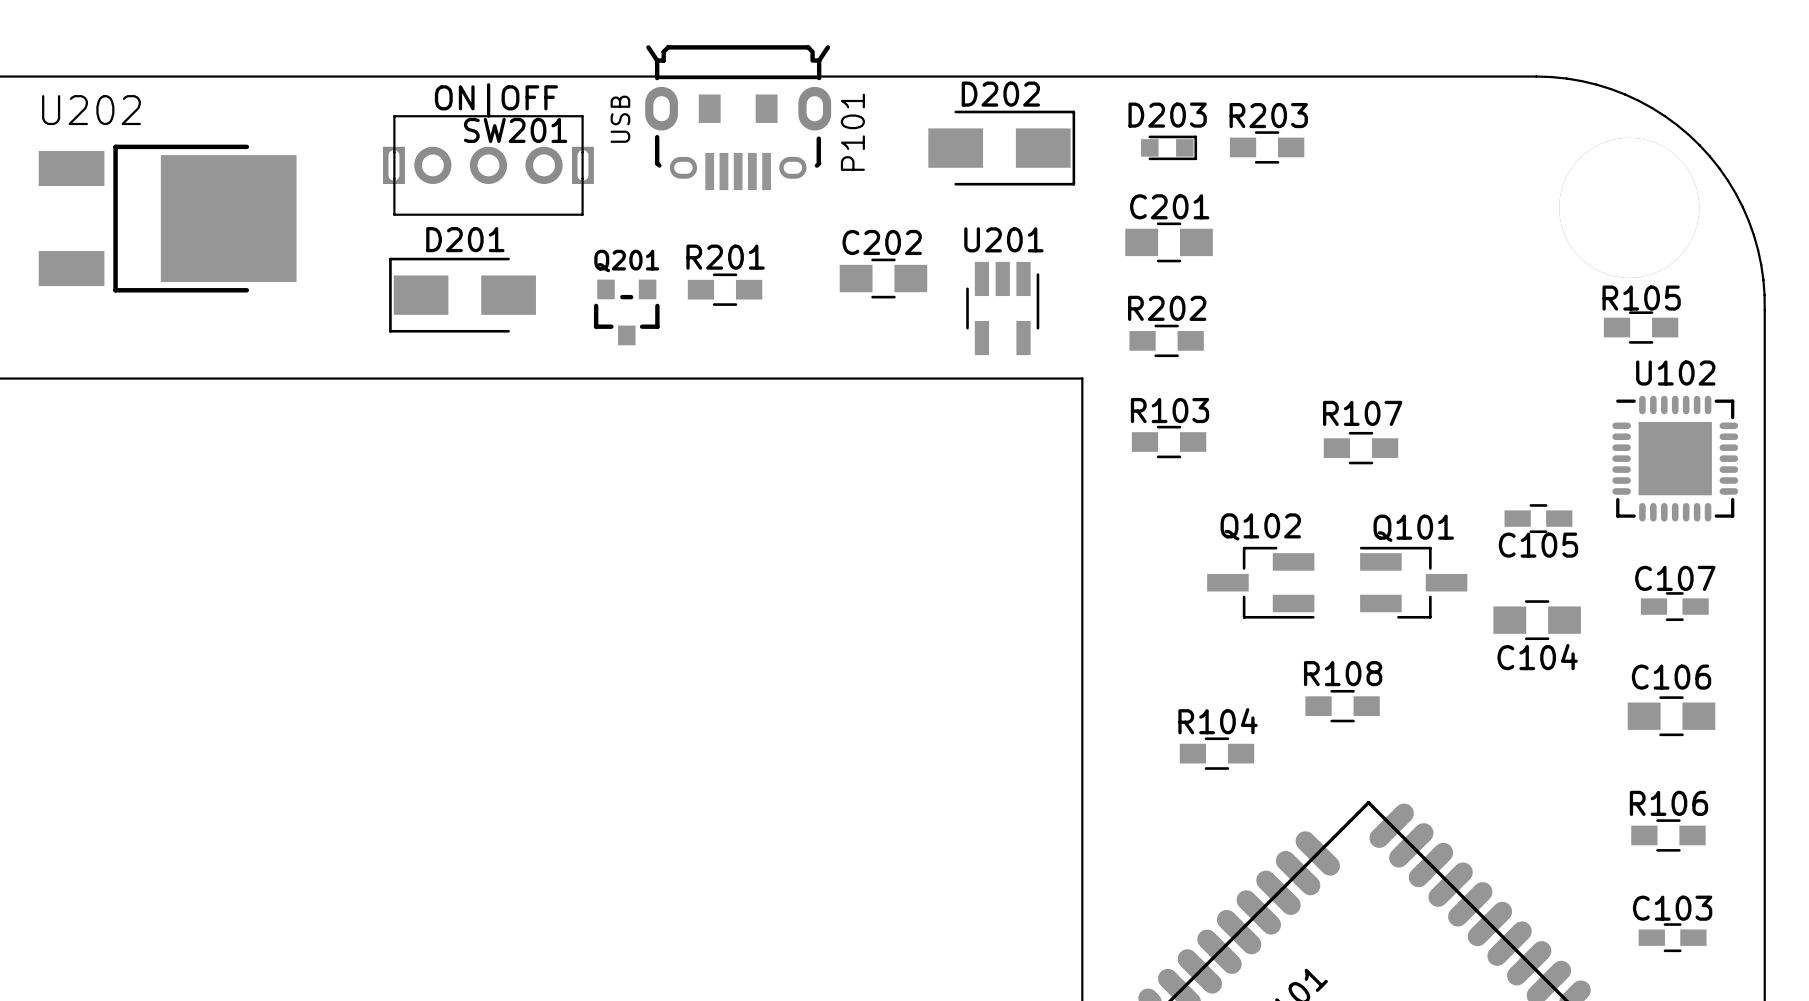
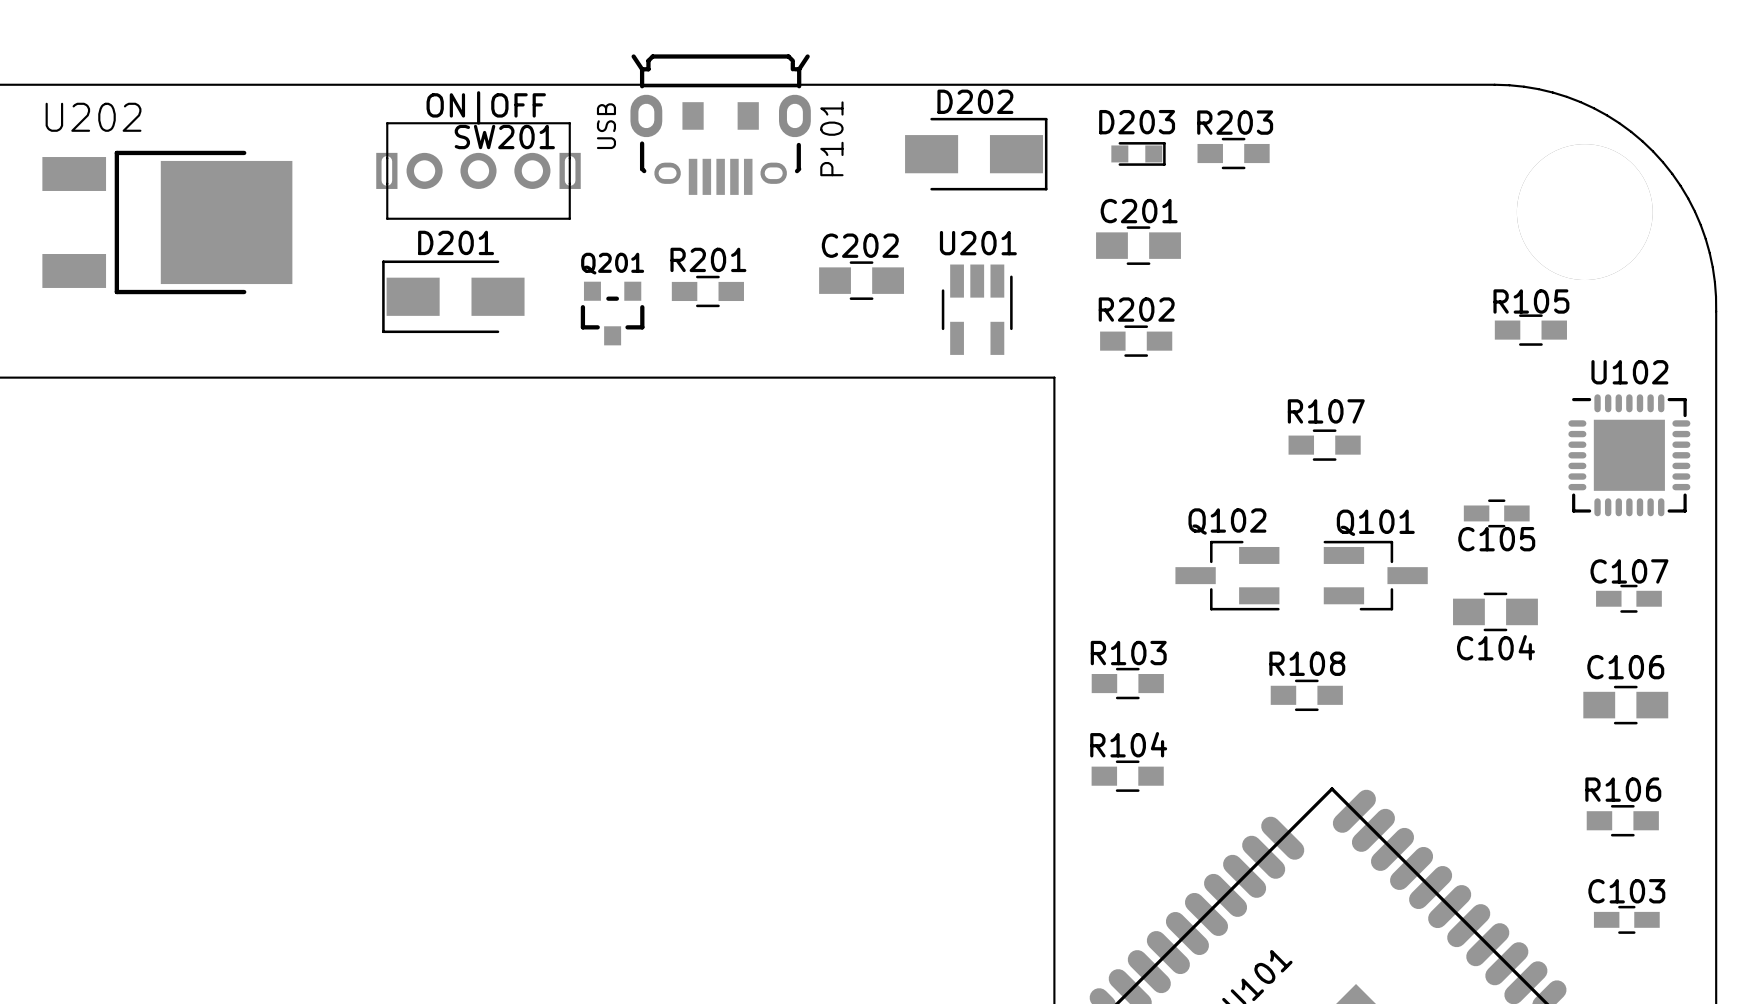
R105 position: (1641, 327) -> (1530, 330)
R103 position: (1169, 442) -> (1127, 683)
R104 position: (1216, 753) -> (1127, 776)

